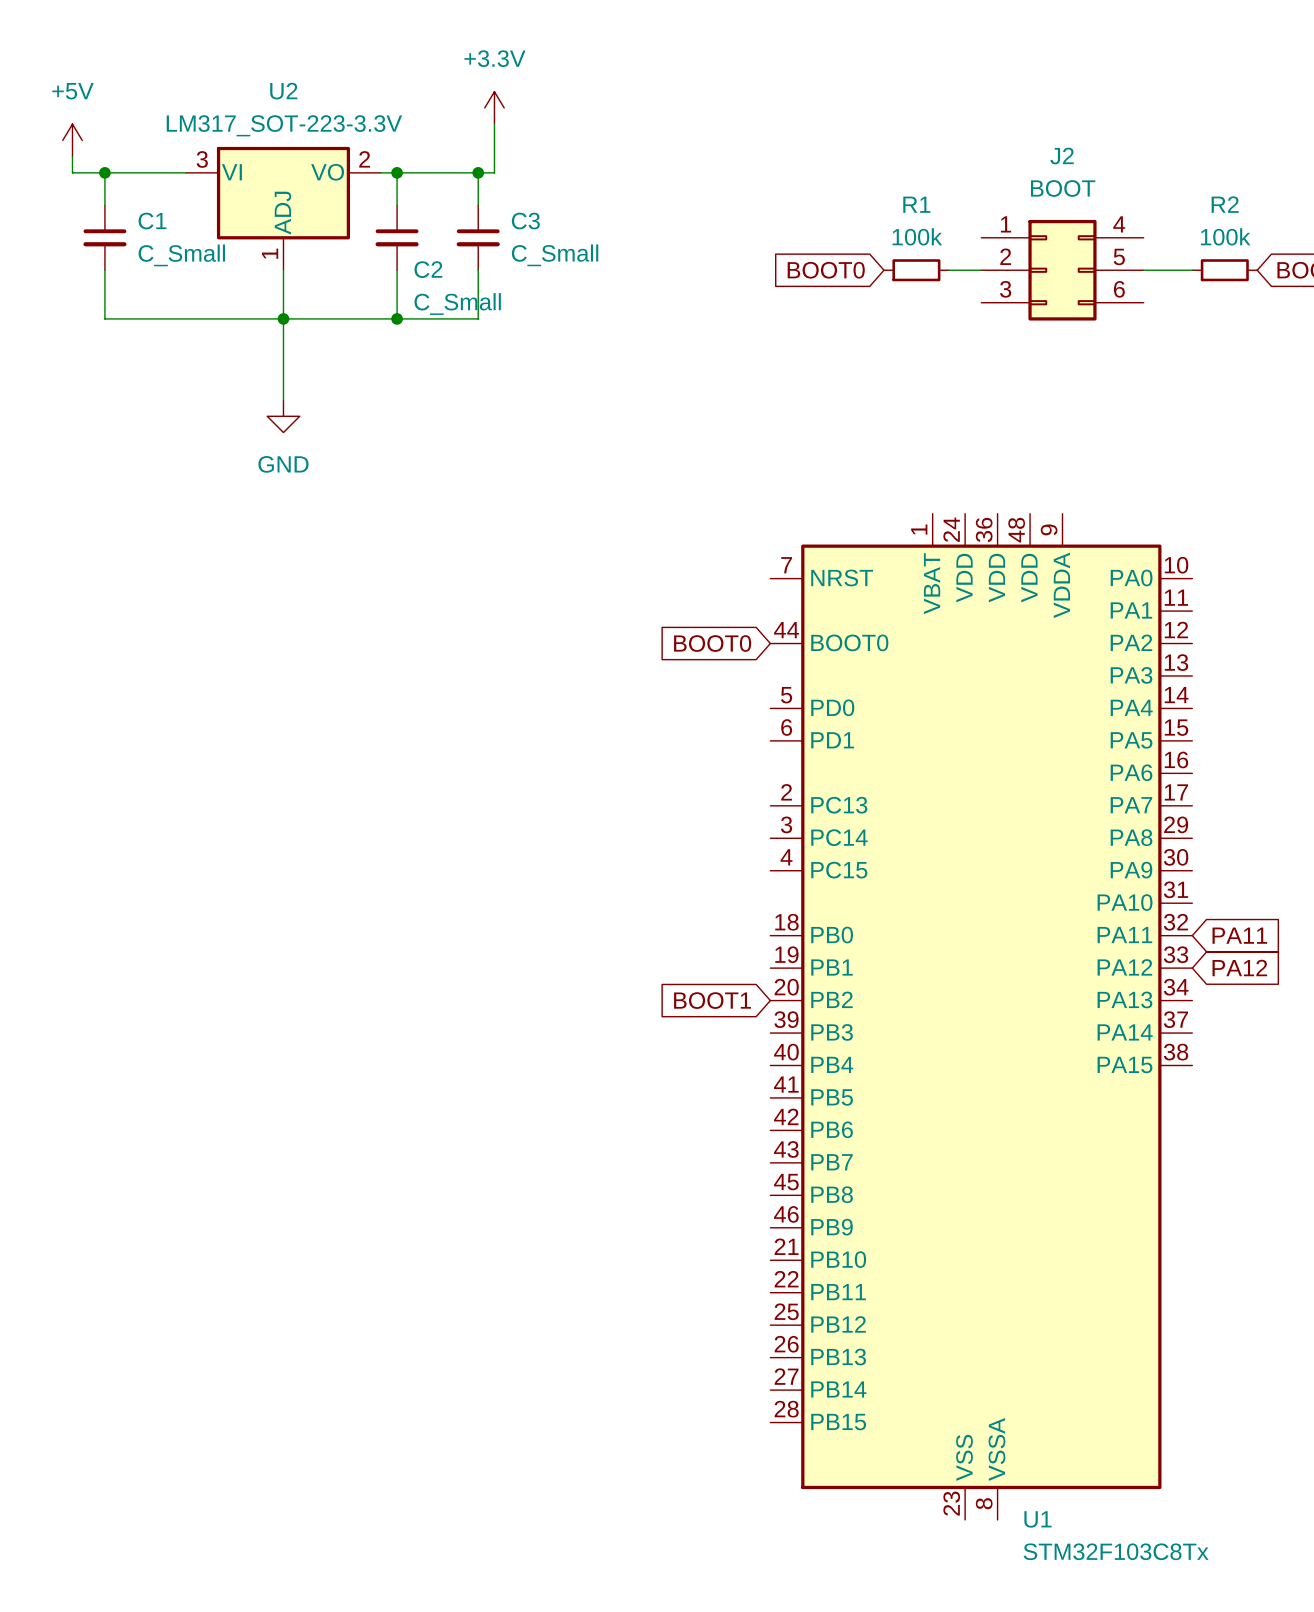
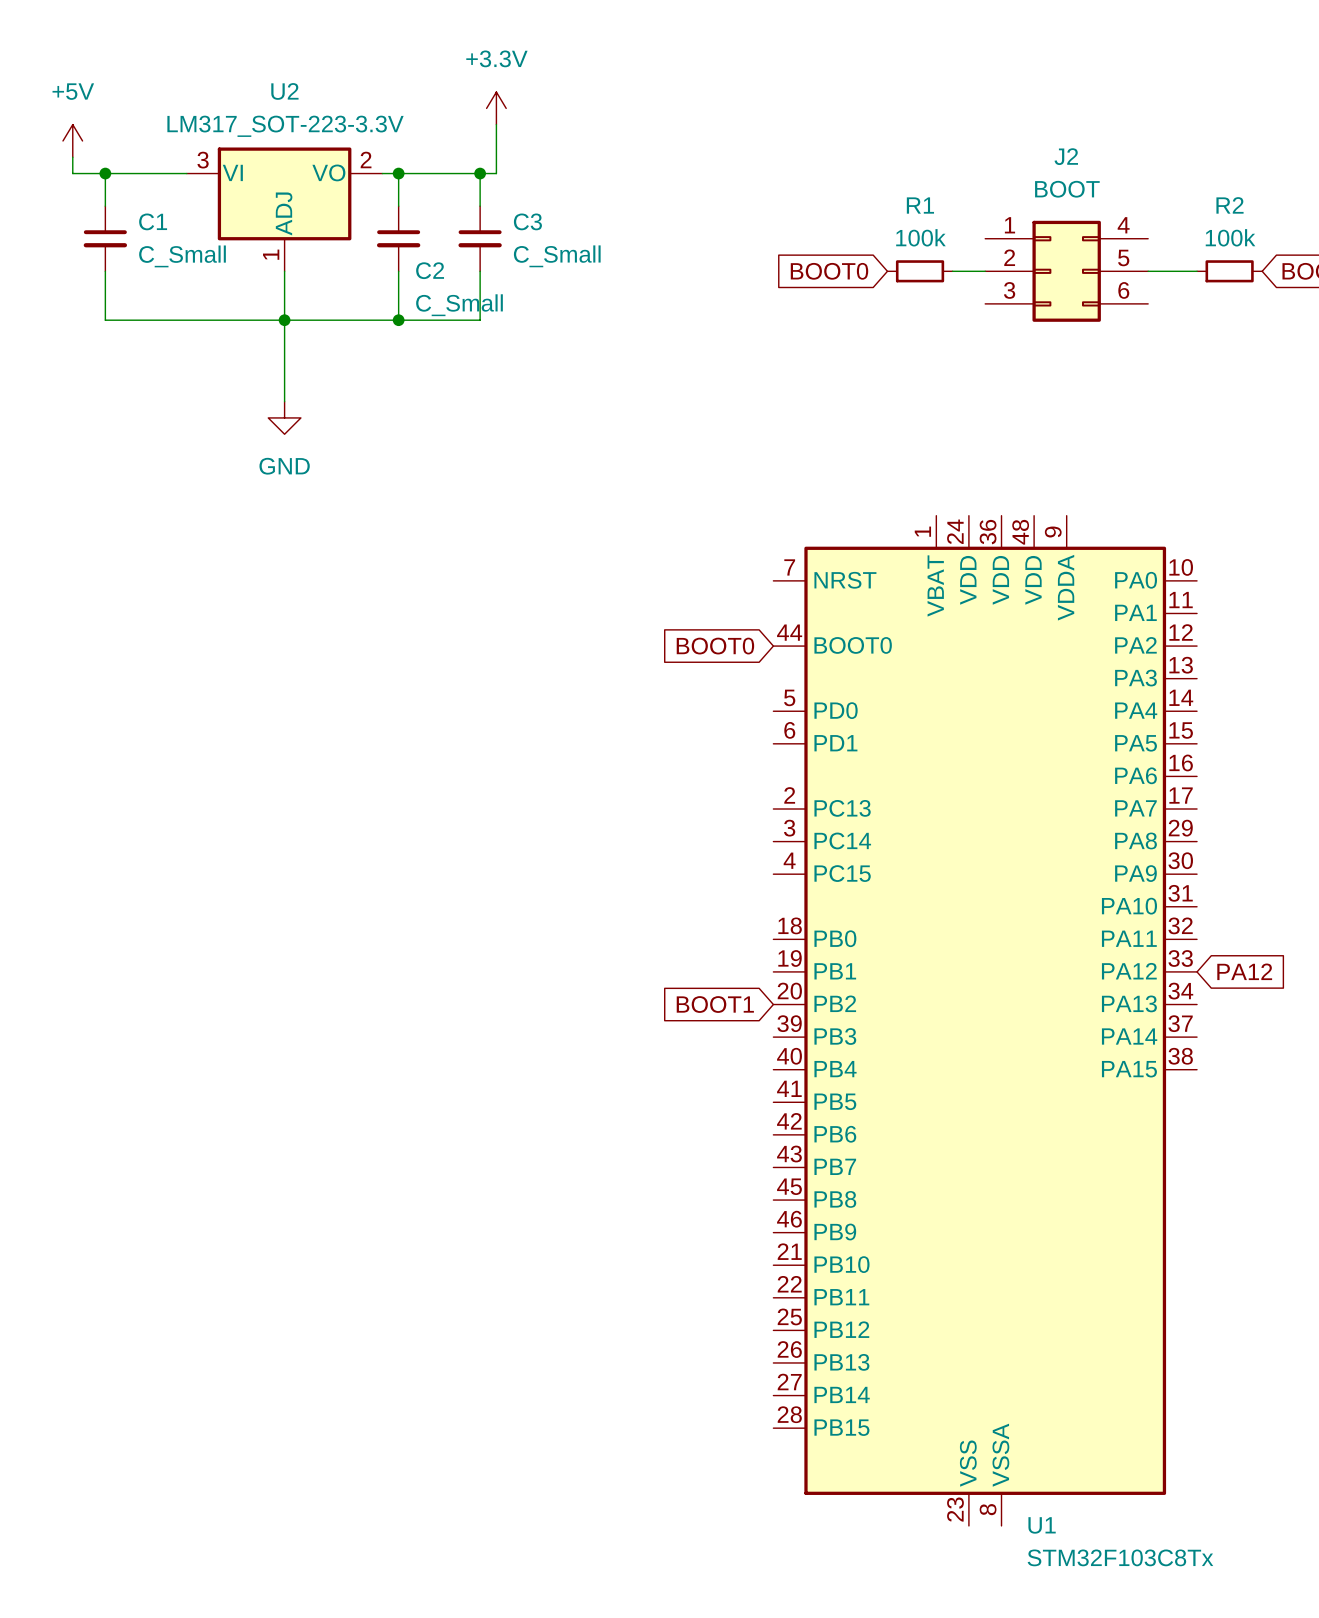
global label: PA11 (1239, 935) -> none

